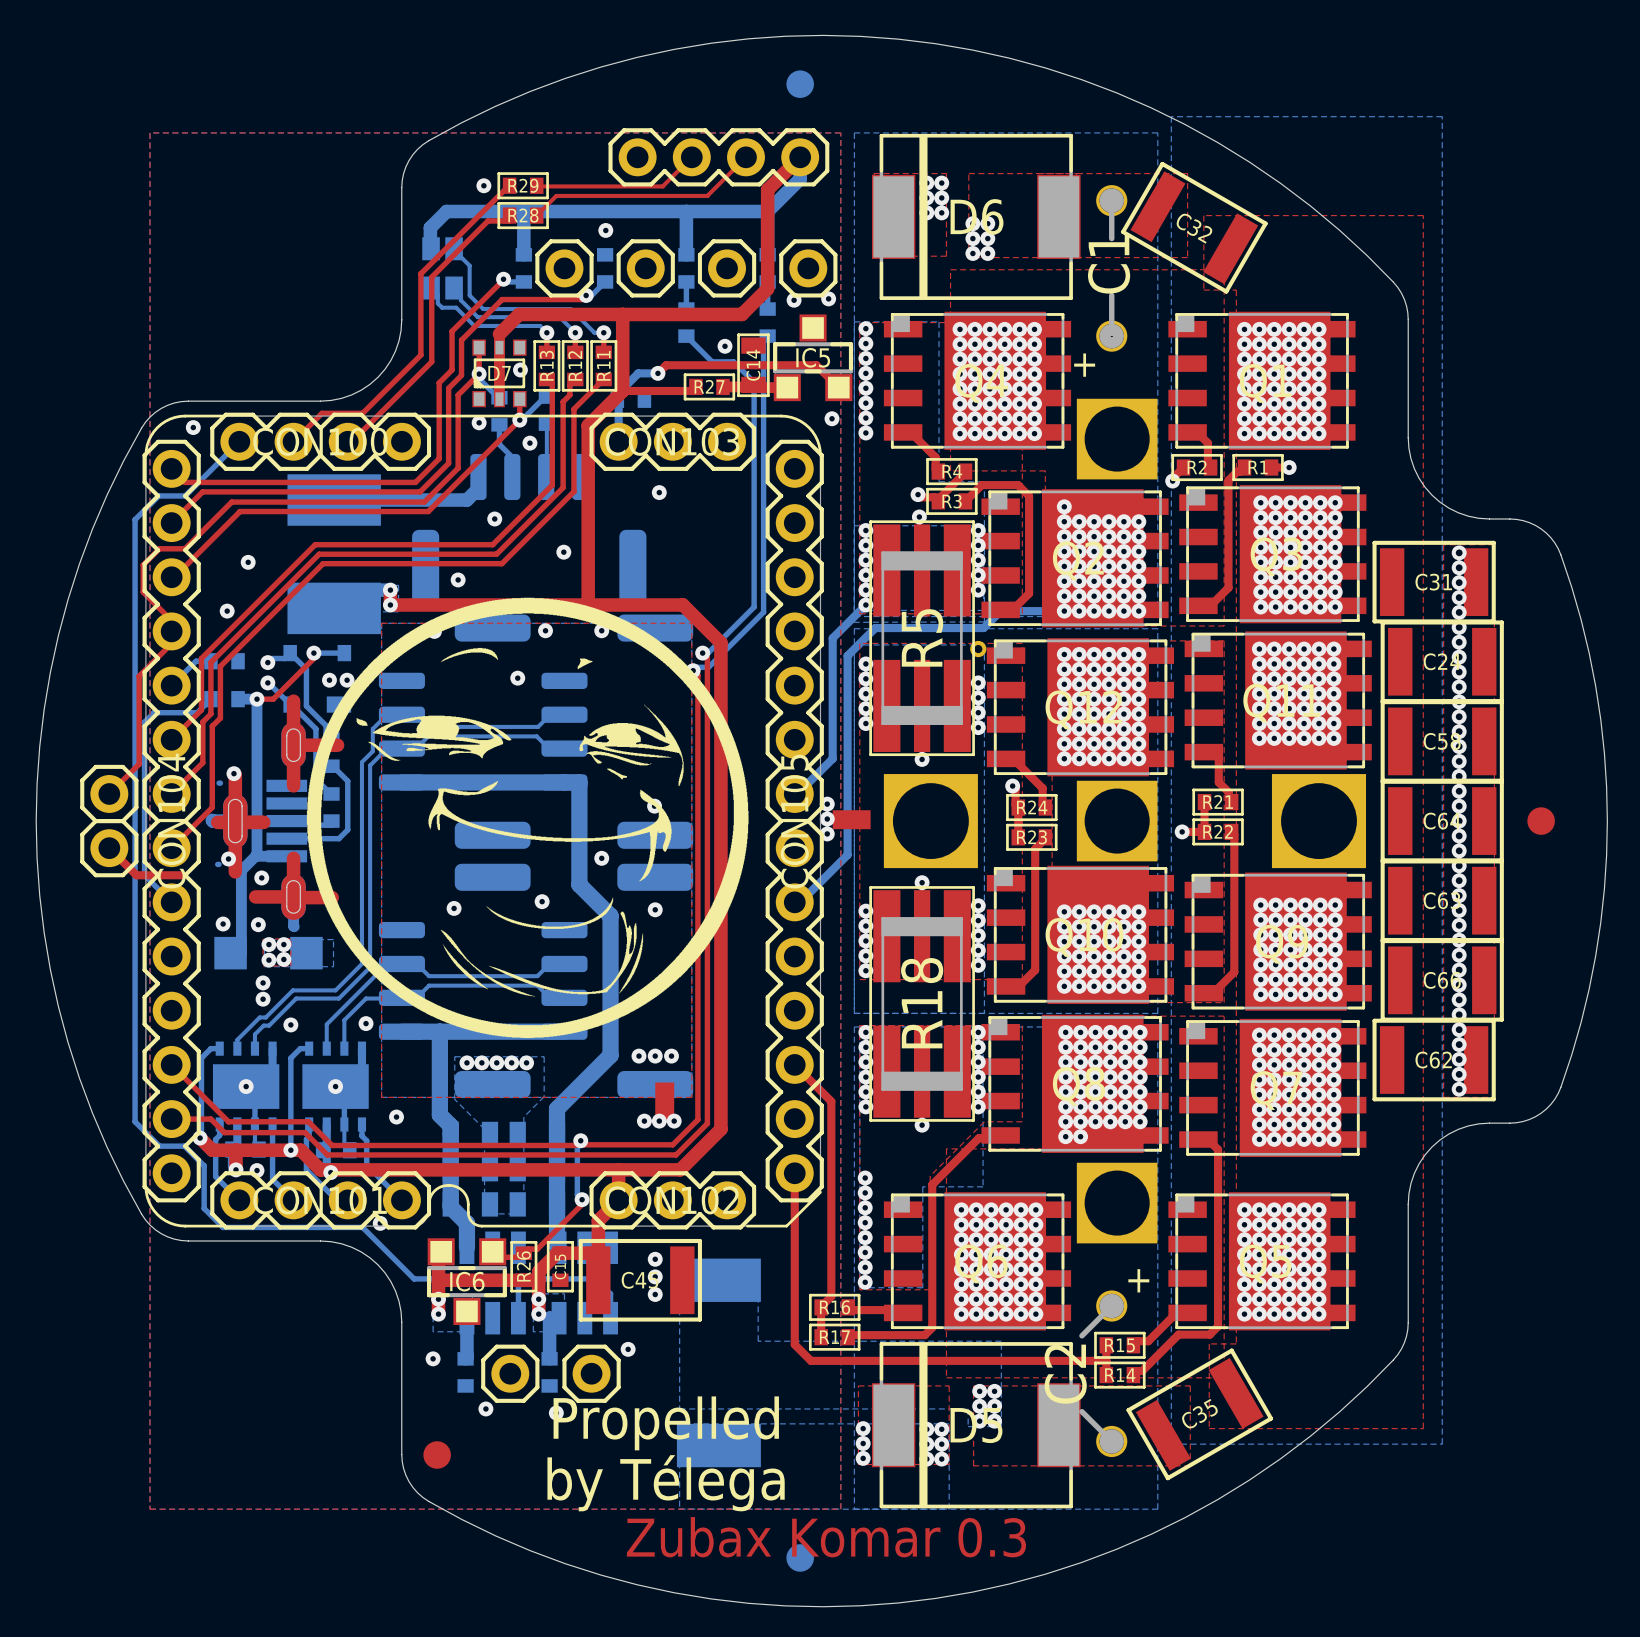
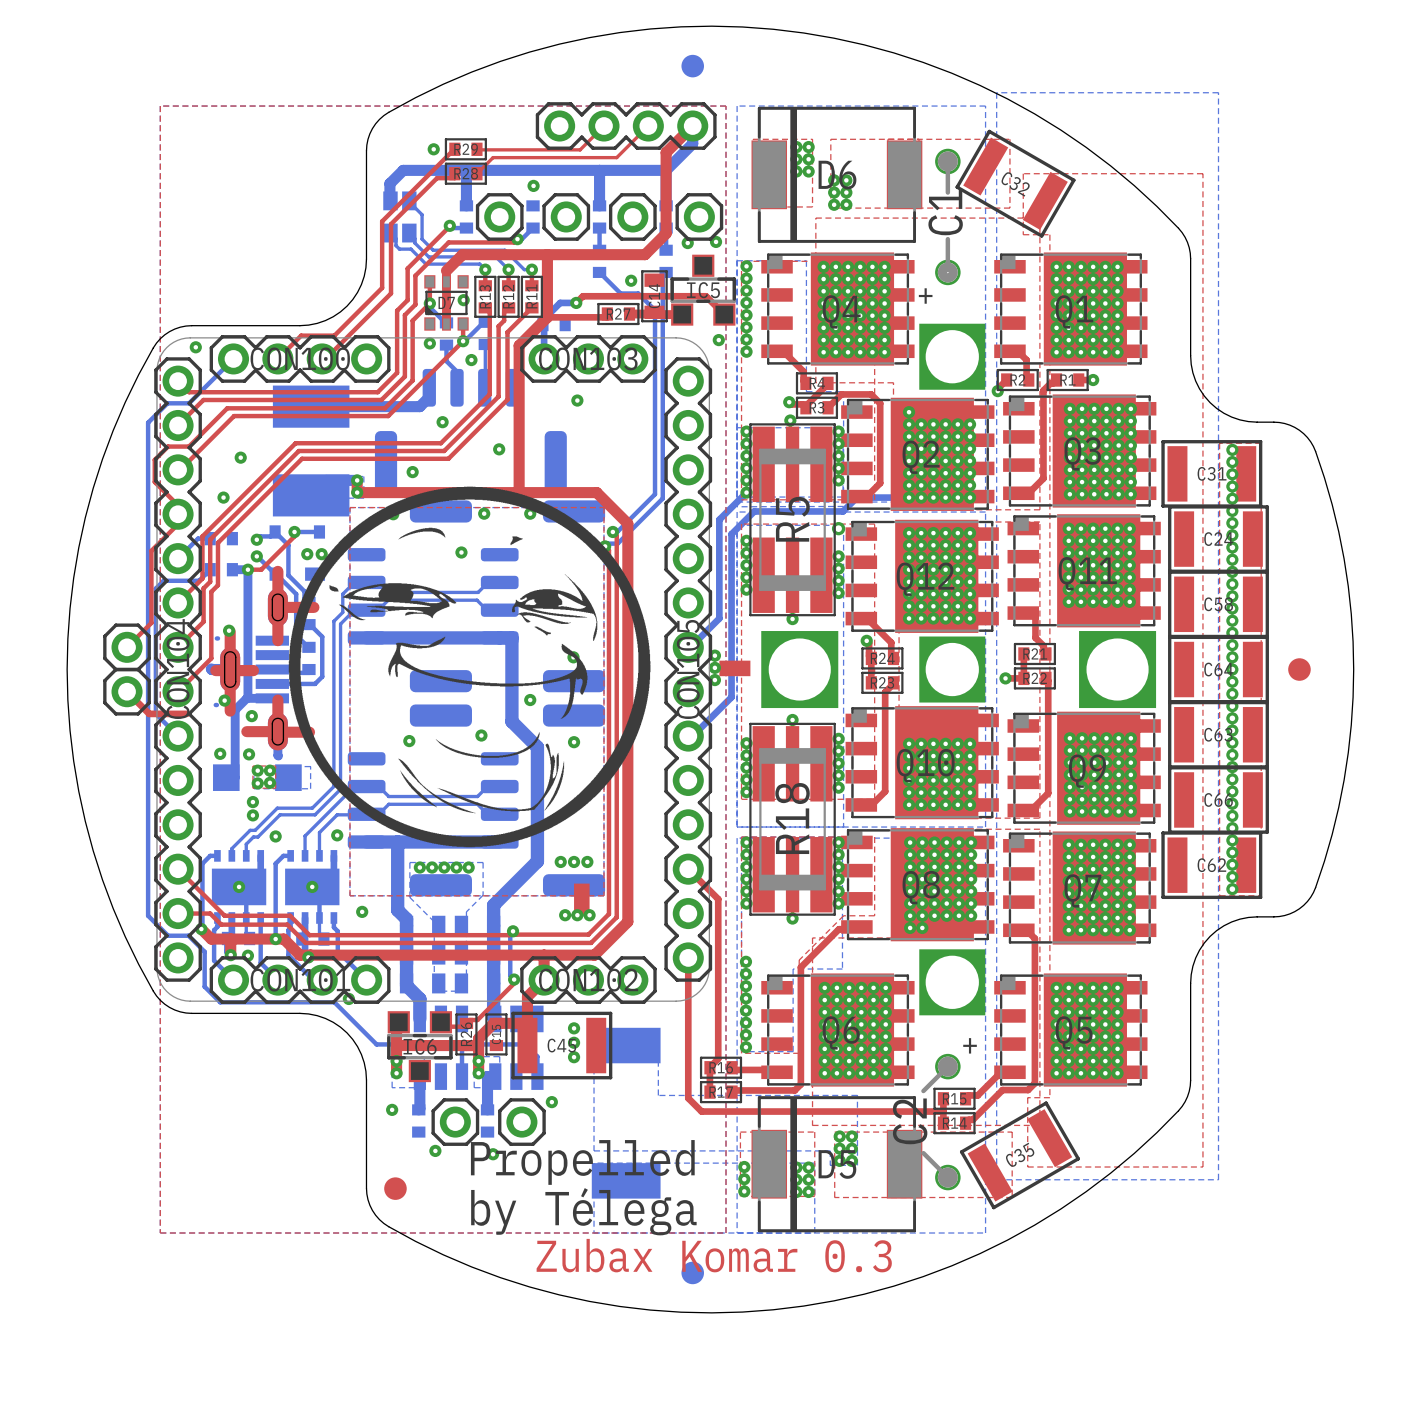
part footprint: [142, 412, 824, 1230] -> [154, 335, 713, 1004]

